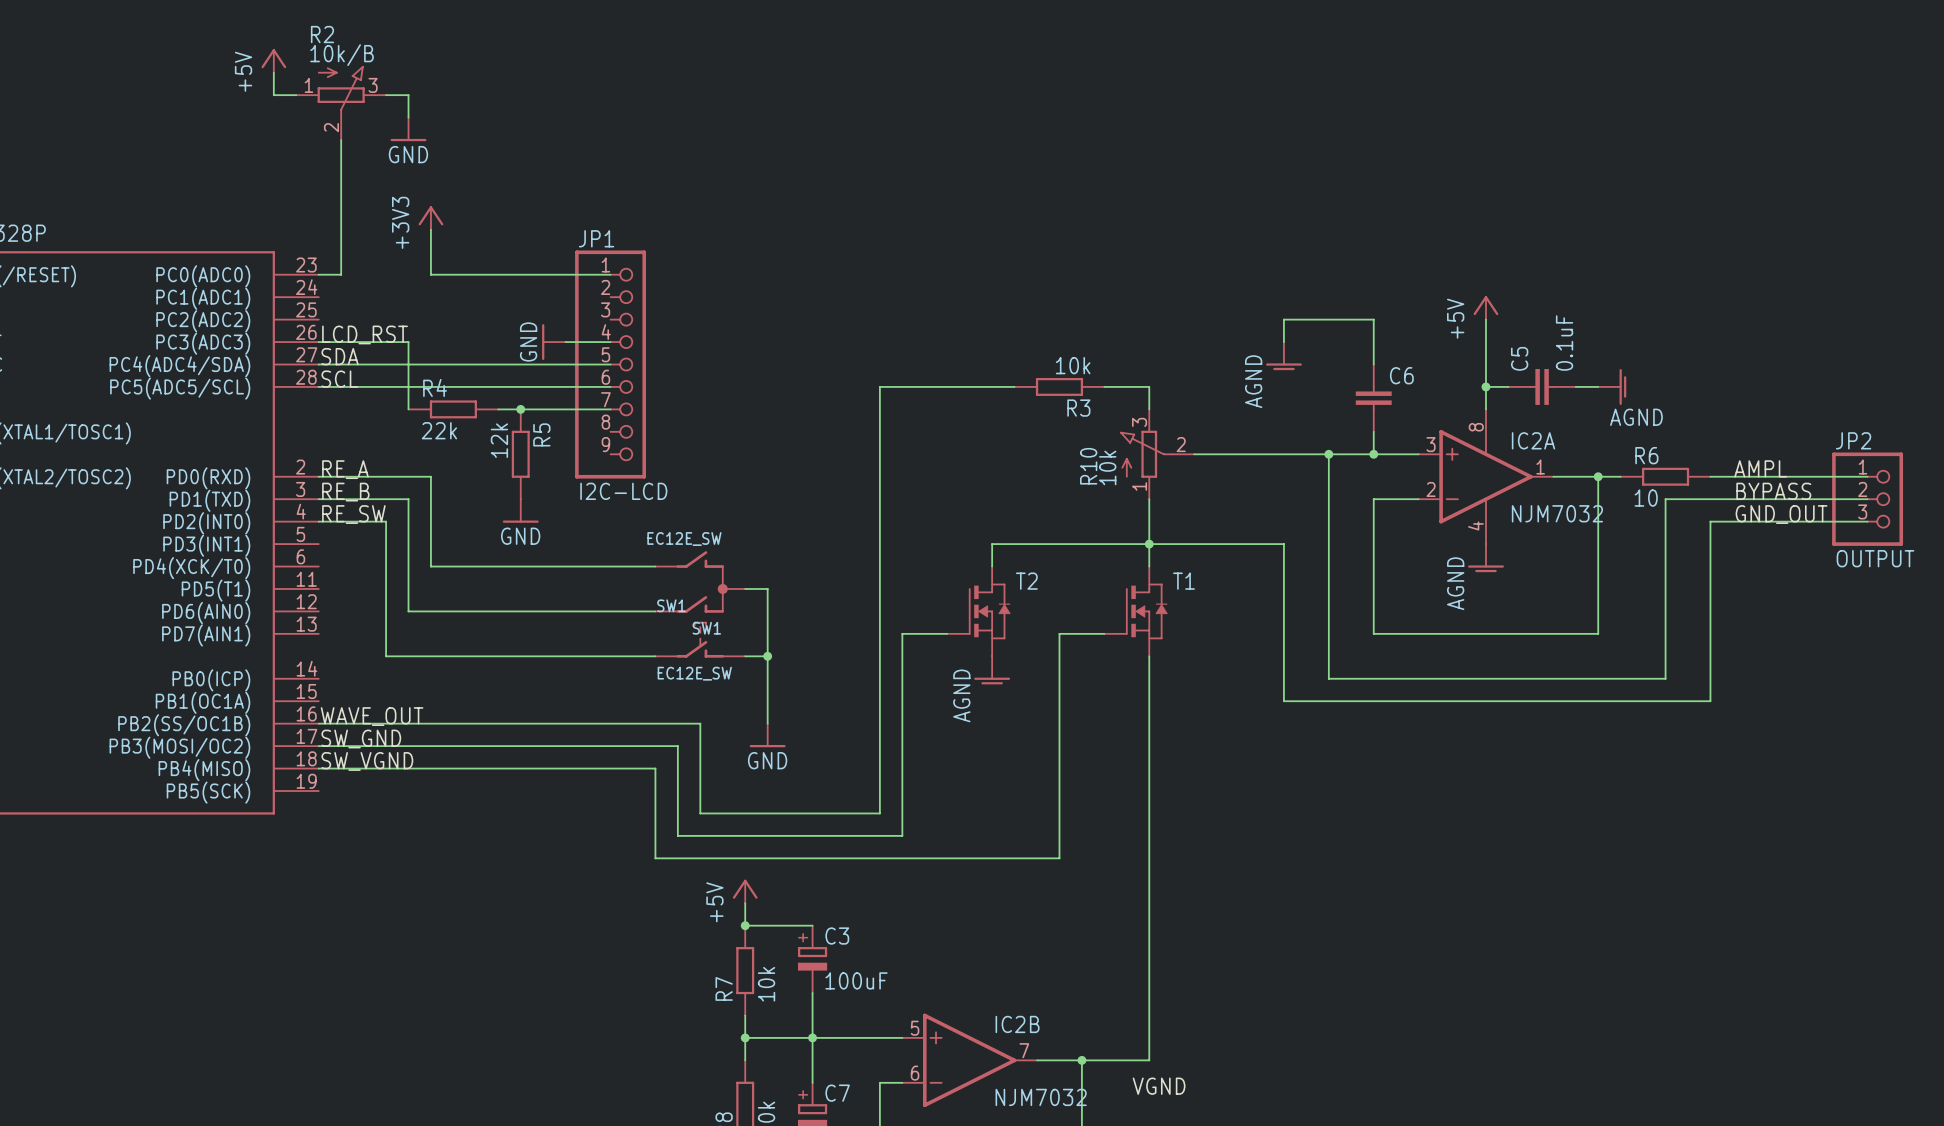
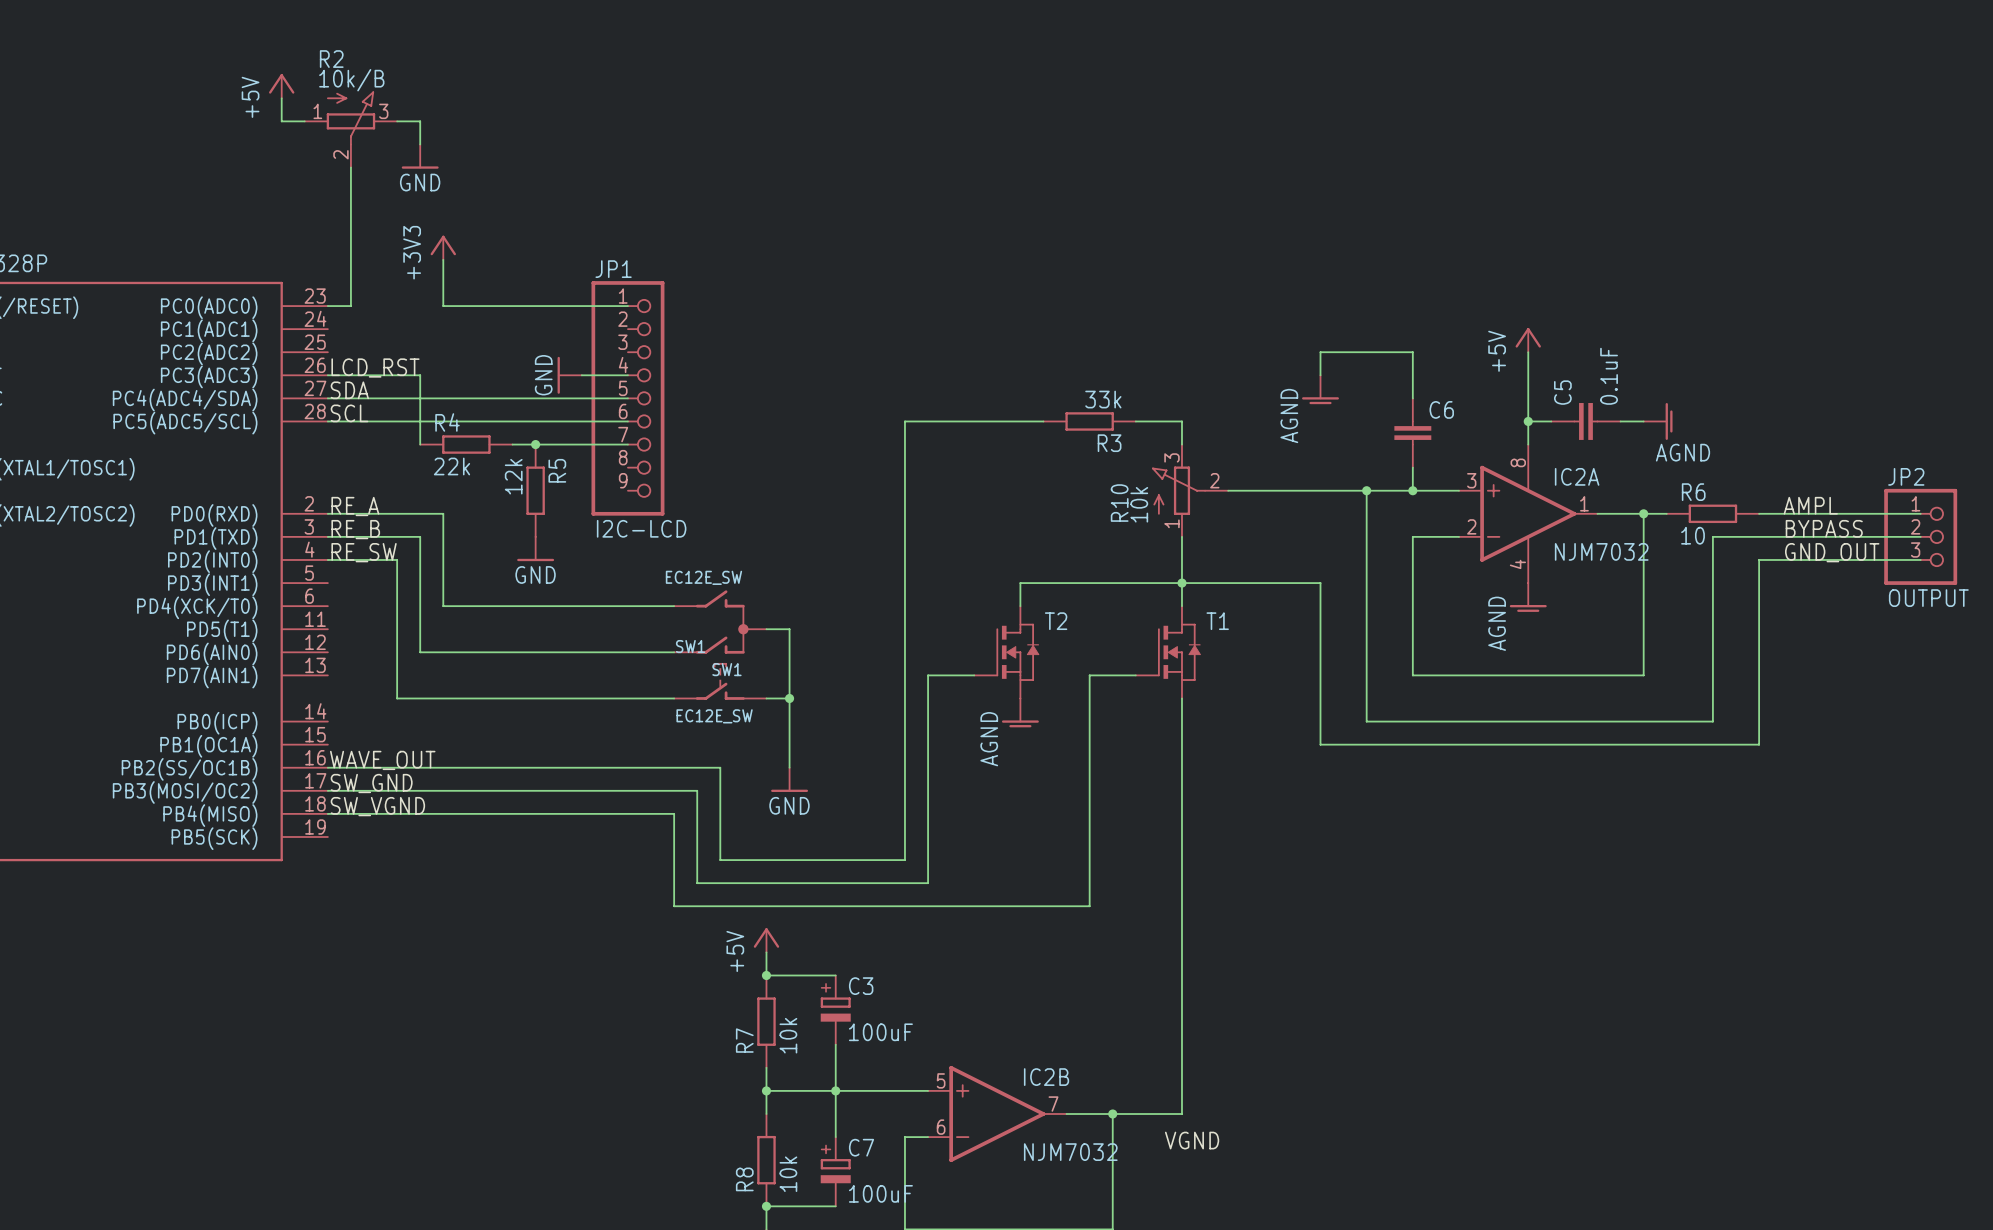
R3 value: 10k (1073, 365) -> 33k (1103, 399)

